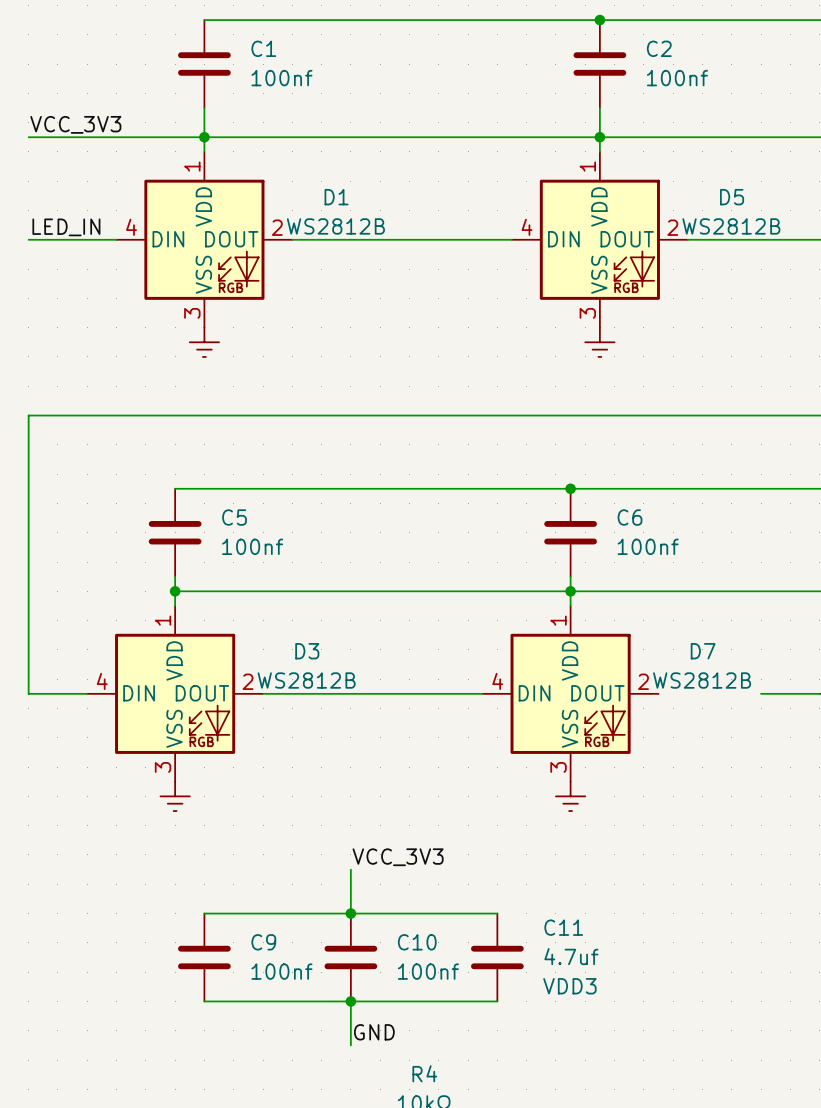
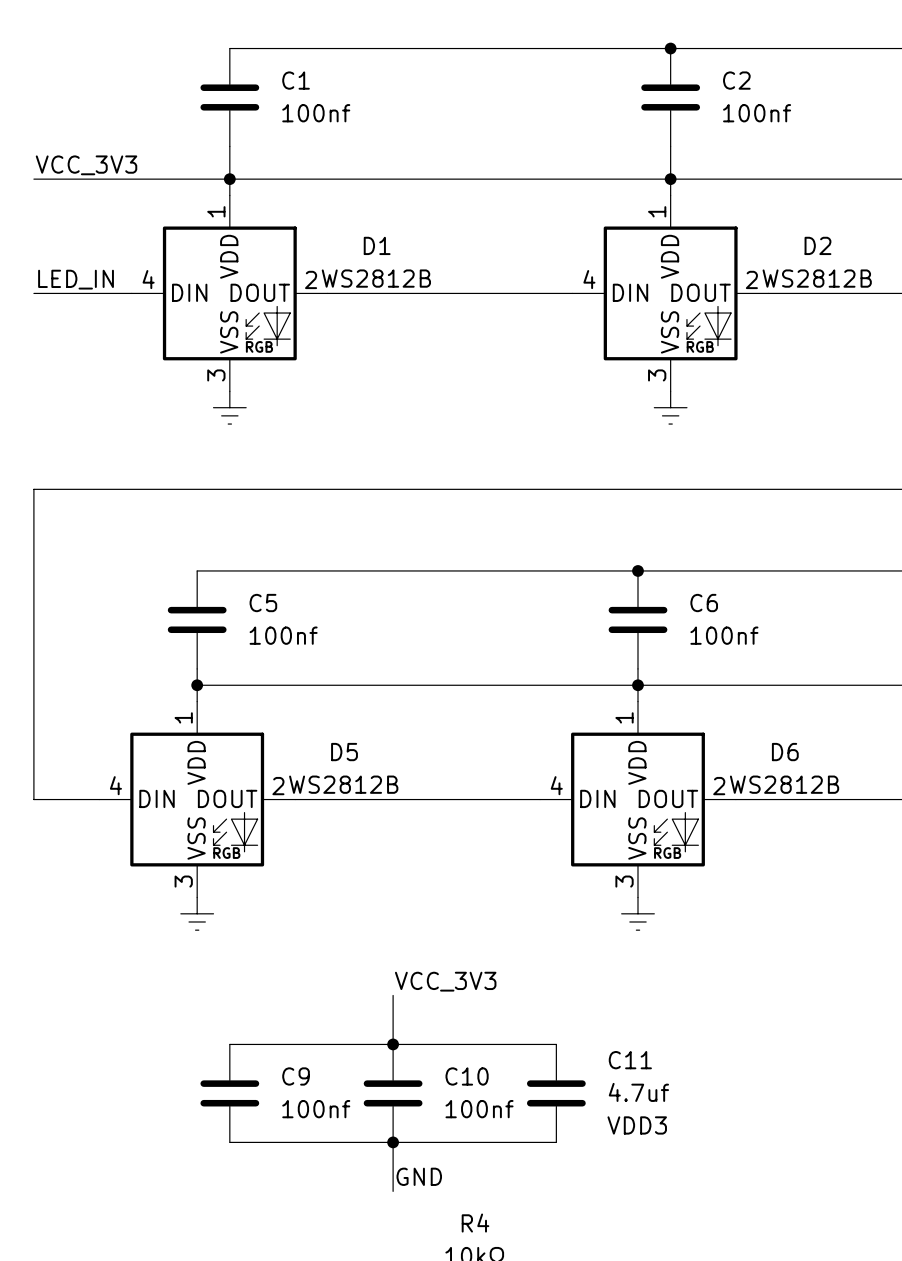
D5 name: D5 (732, 197) -> D2 (817, 245)
D3 name: D3 (307, 651) -> D5 (344, 752)
D7 name: D7 (703, 651) -> D6 (785, 752)
wire: none -> (735, 799) (850, 799)

